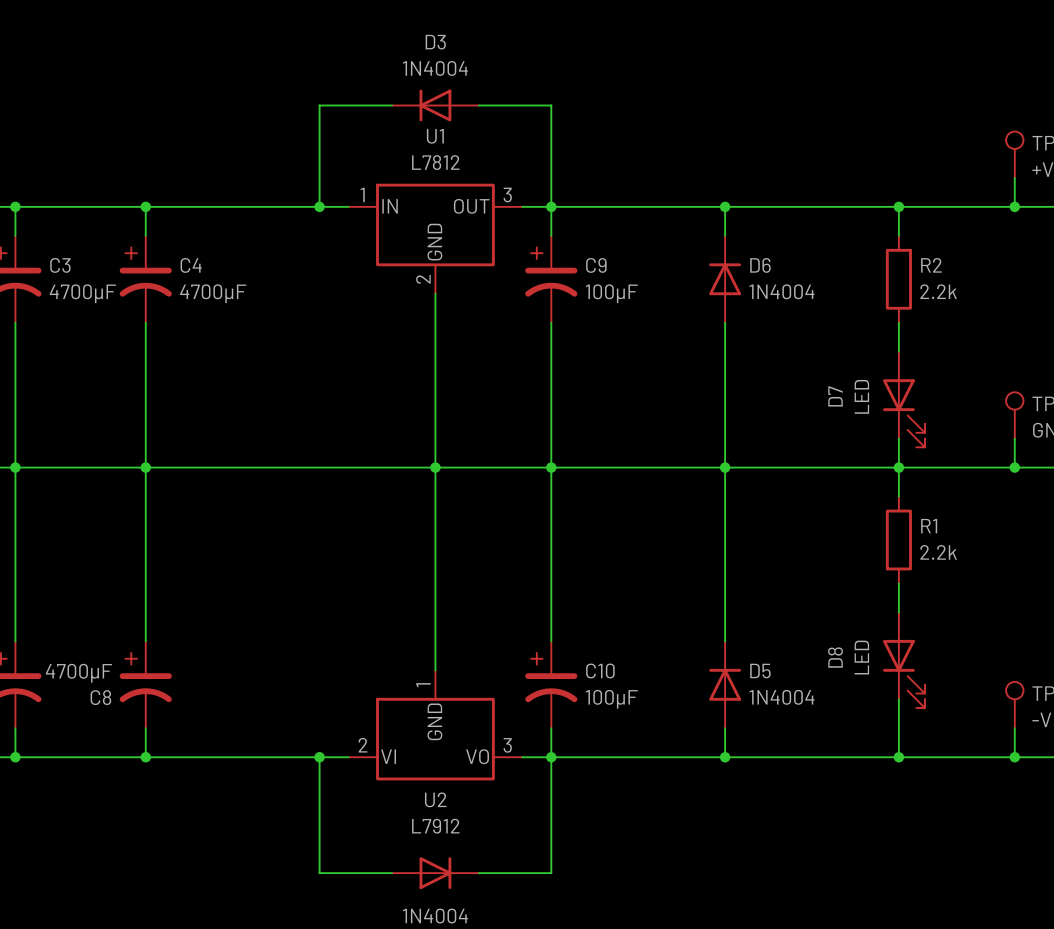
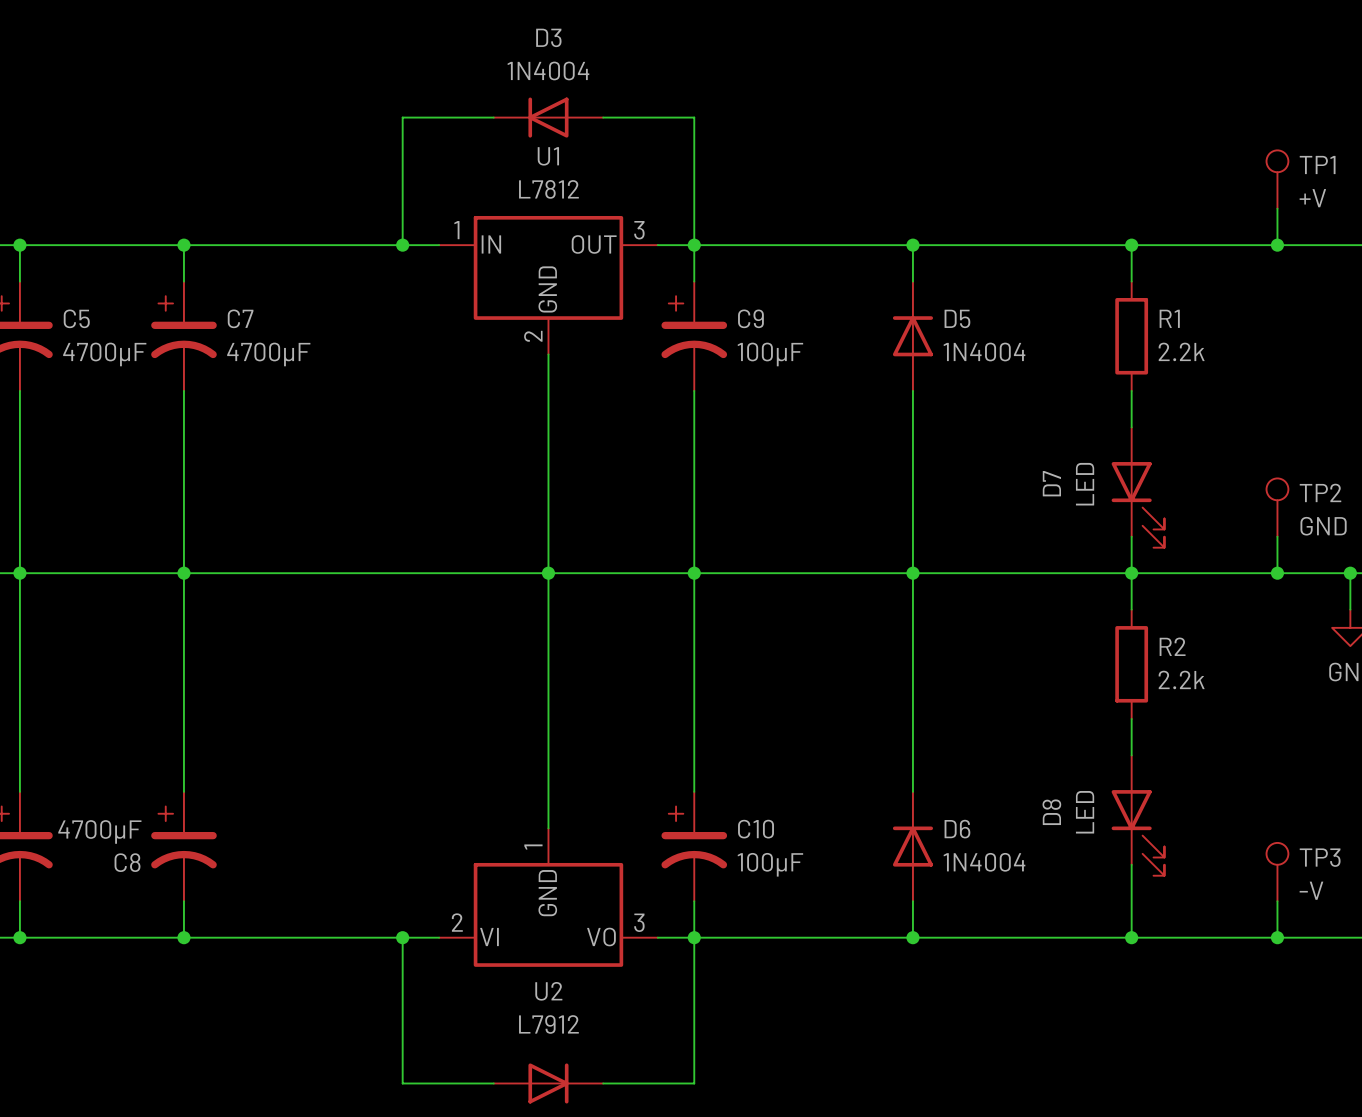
C3 name: C3 (60, 265) -> C5 (76, 318)
C4 name: C4 (191, 265) -> C7 (240, 318)
D6 name: D6 (760, 265) -> D5 (957, 318)
R2 name: R2 (931, 265) -> R1 (1169, 318)
R1 name: R1 (929, 526) -> R2 (1172, 646)
D5 name: D5 (760, 671) -> D6 (957, 829)

